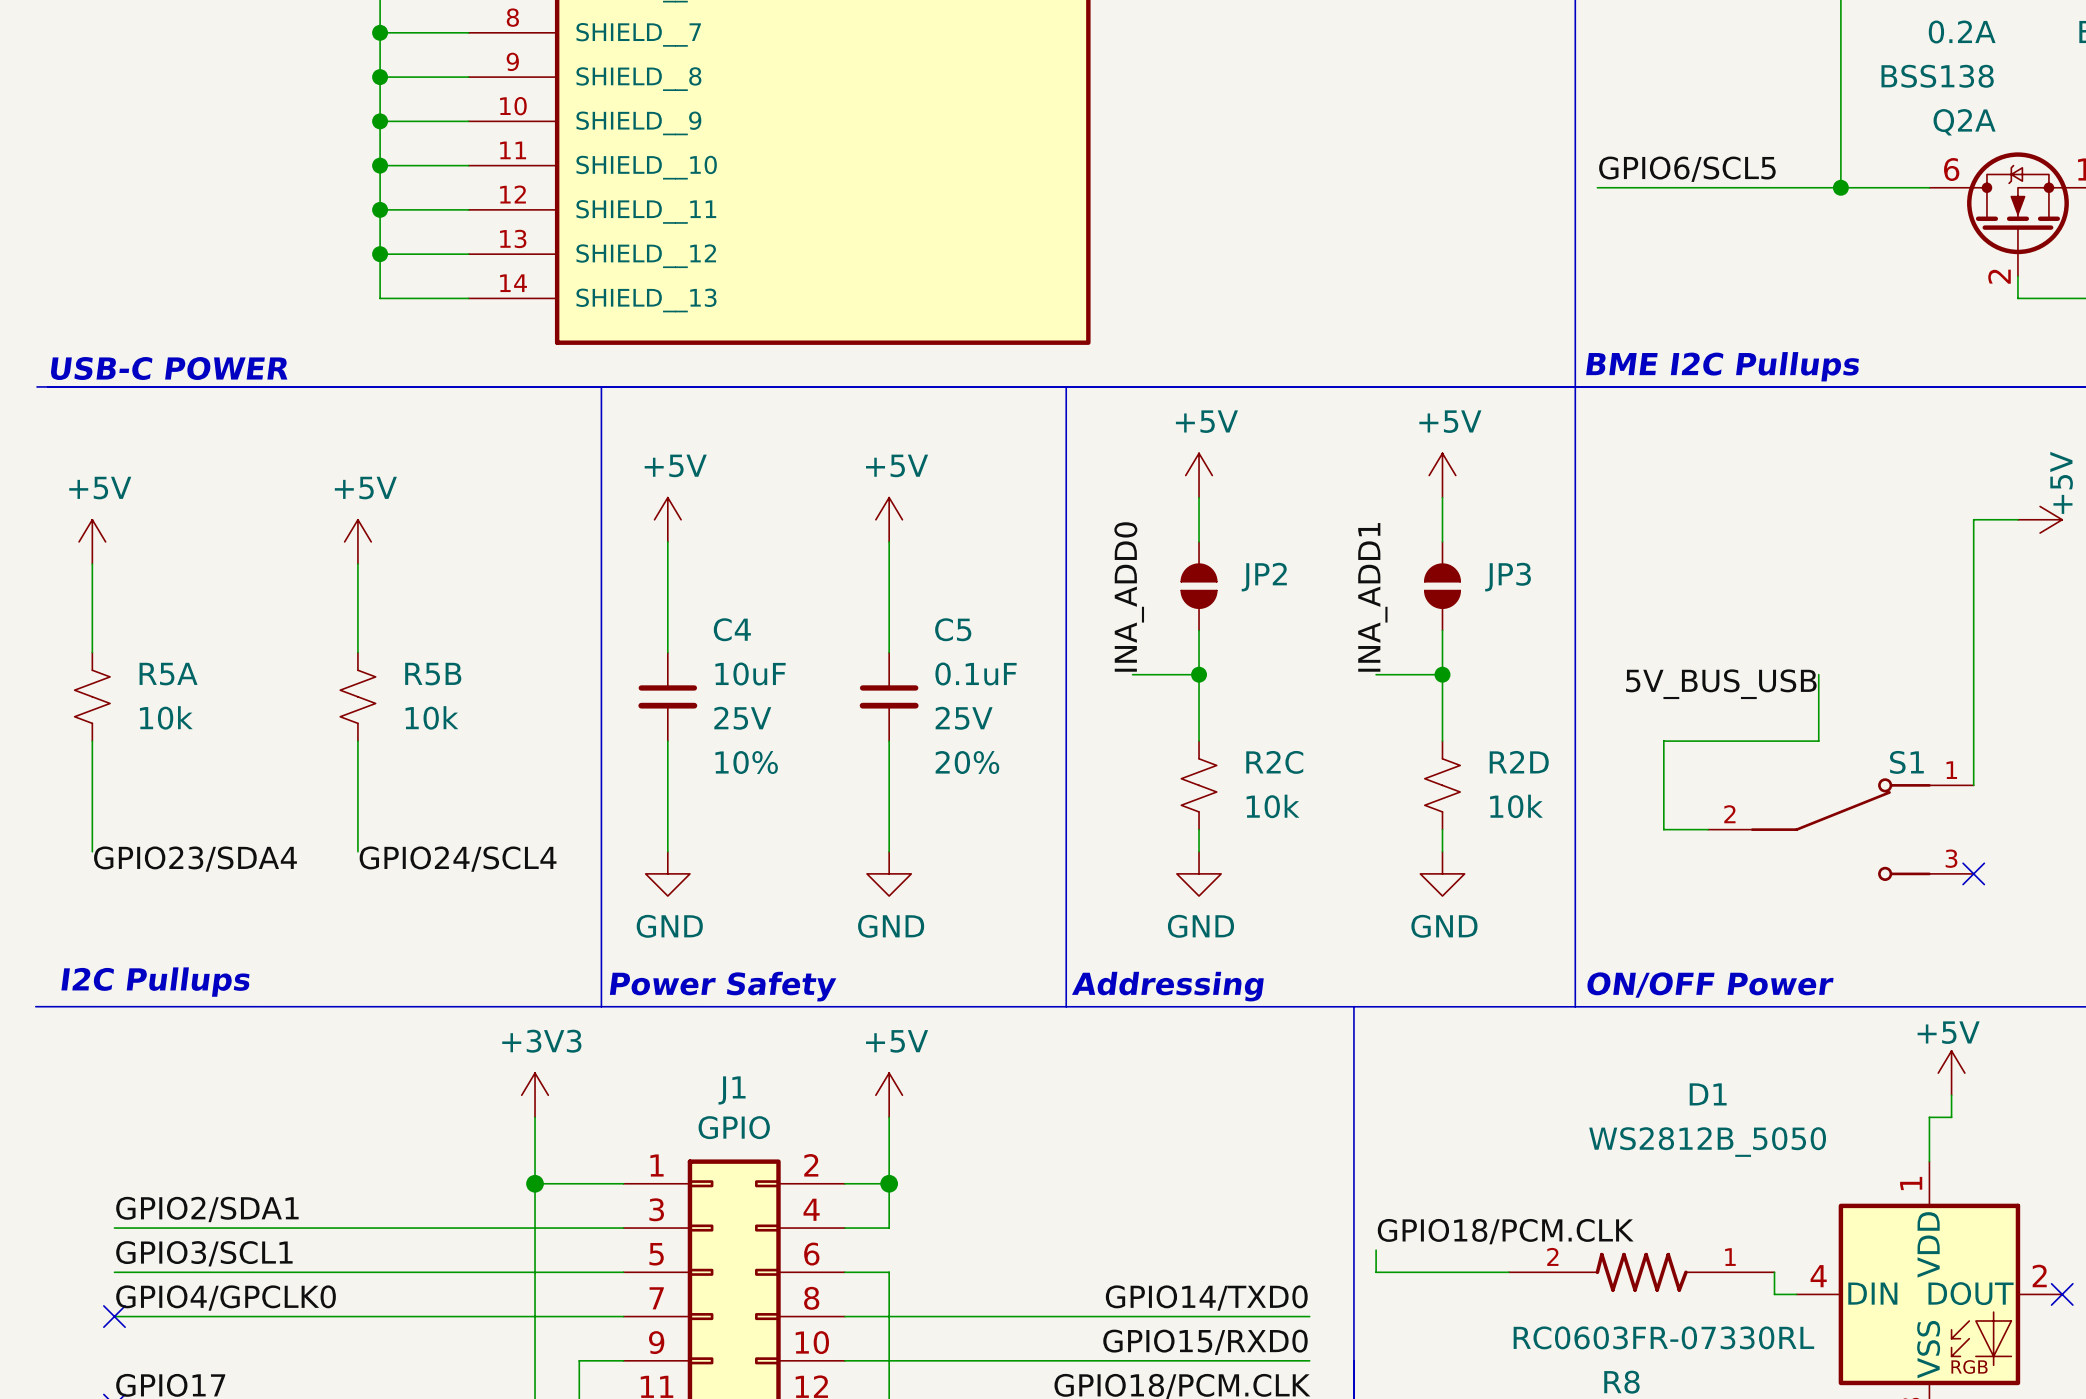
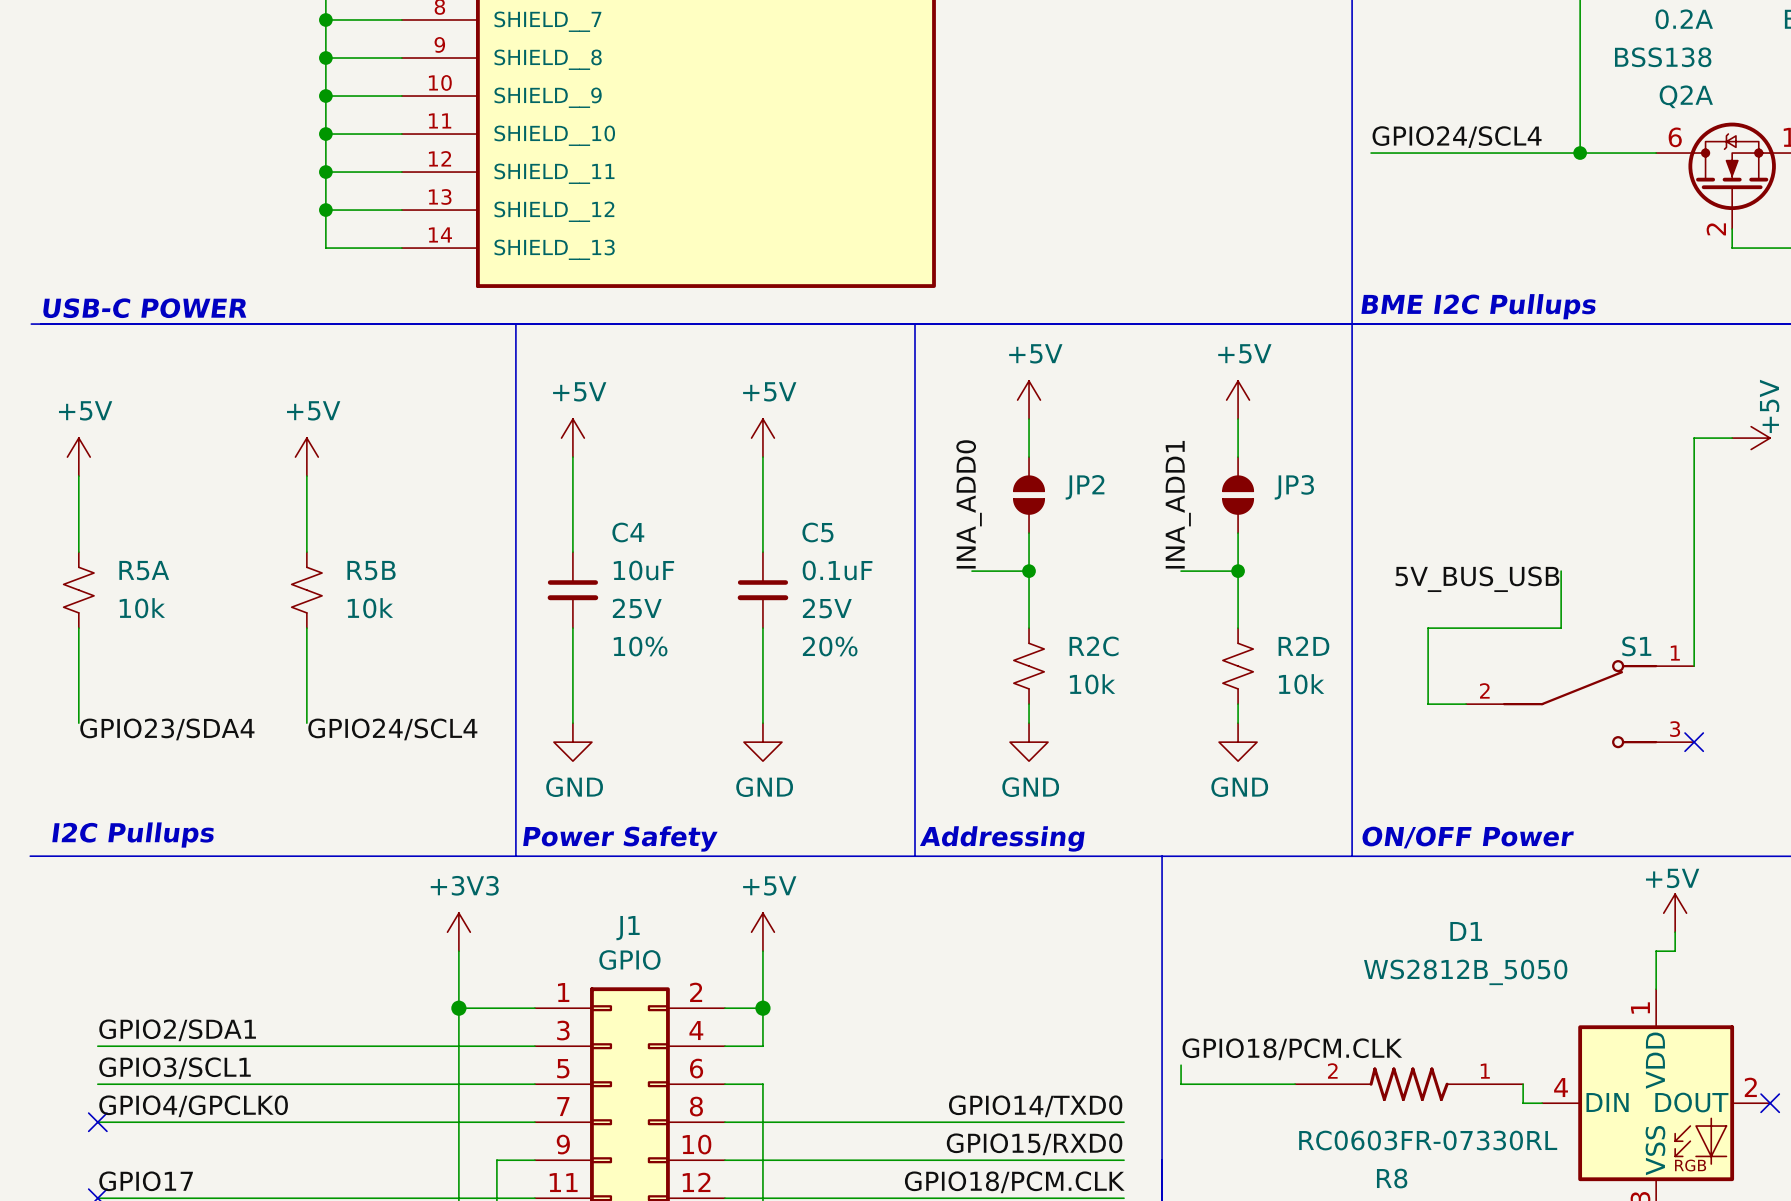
label: GPIO6/SCL5 (1687, 169) -> GPIO24/SCL4 (1457, 137)

